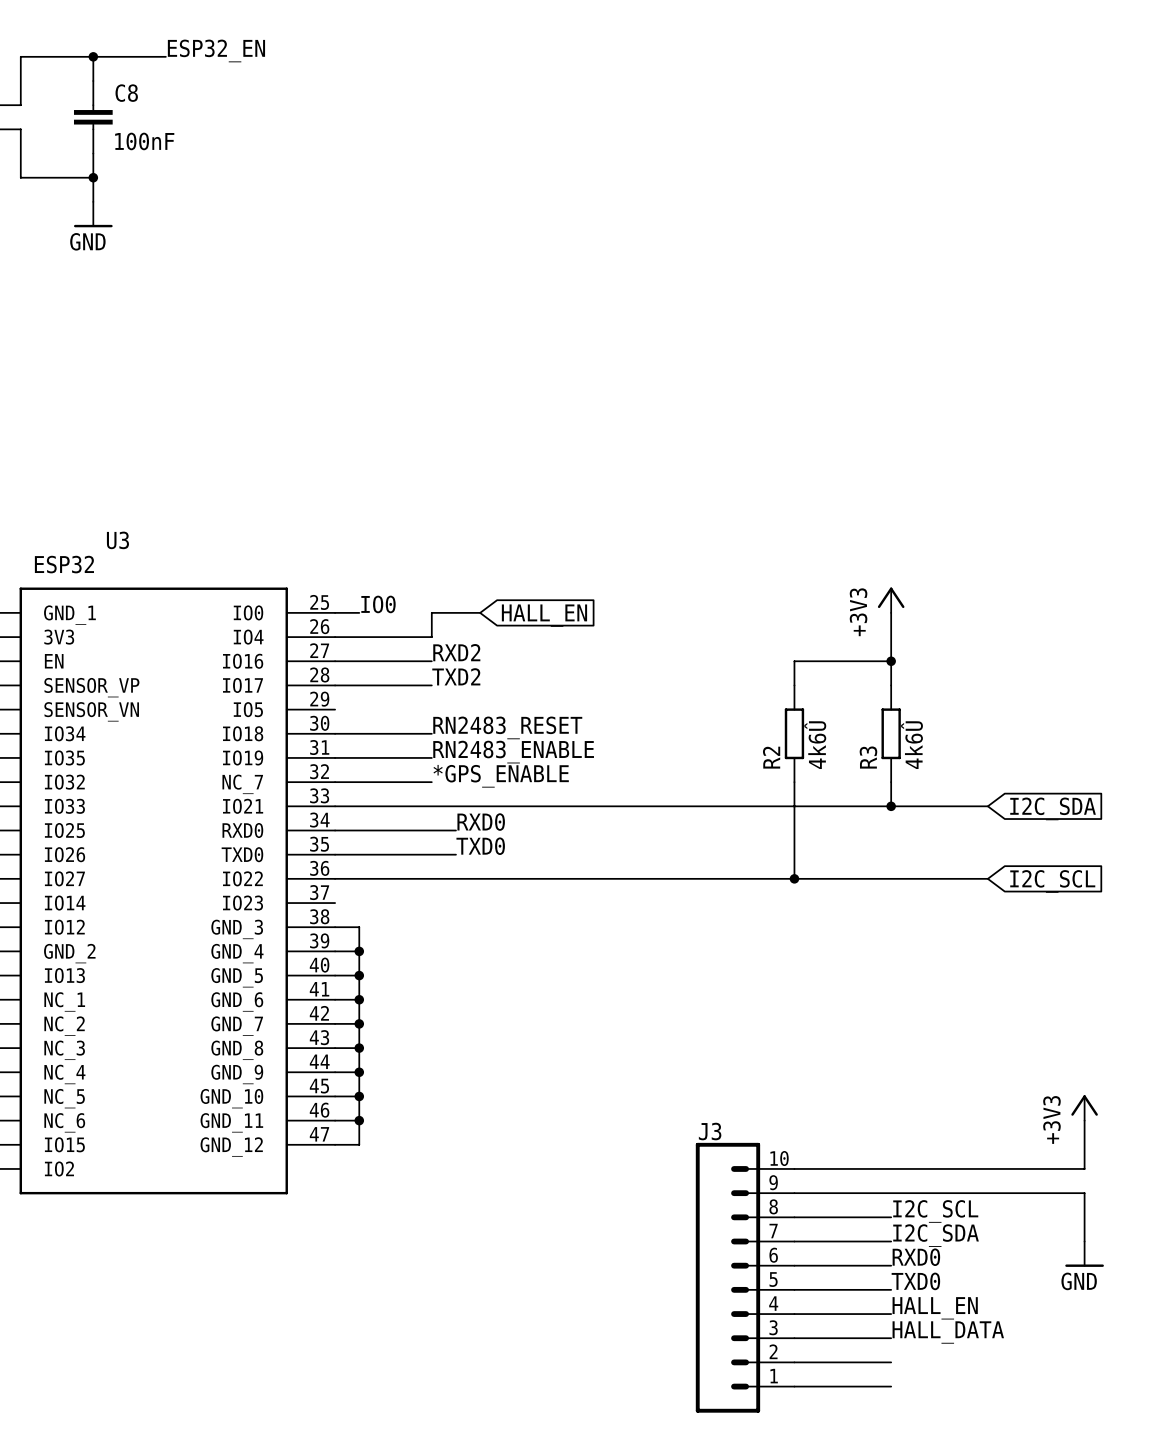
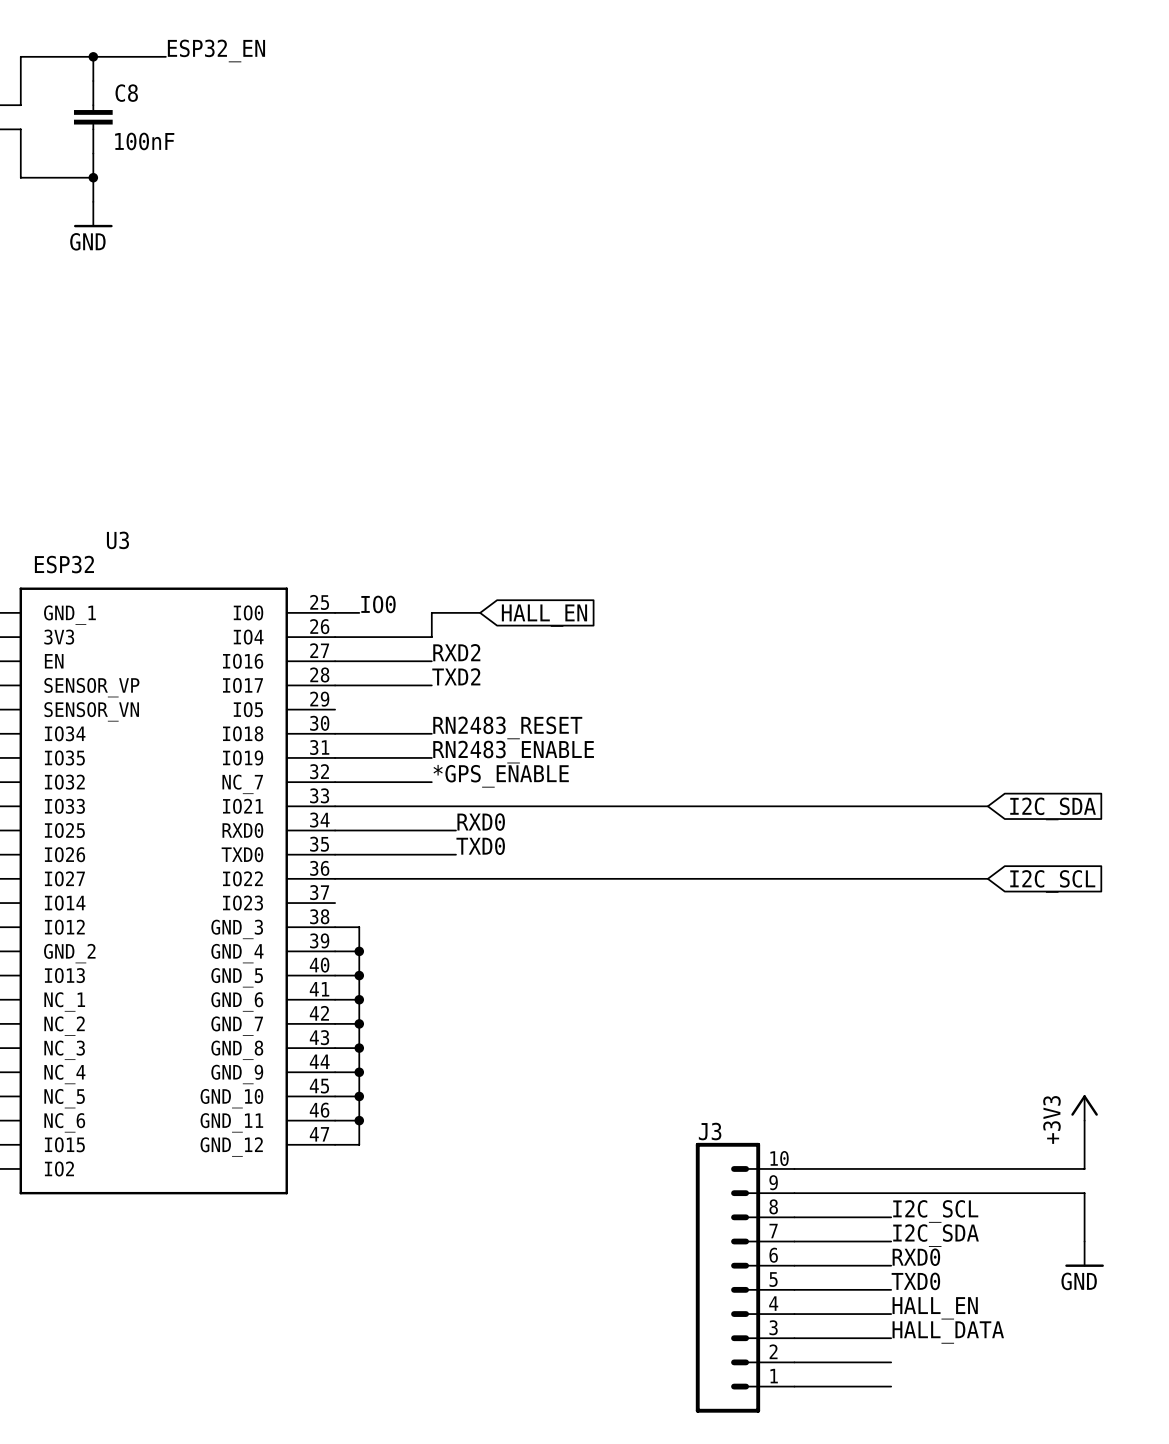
power symbol: +3V3 (891, 600) -> none
wire: (891, 612) (891, 685) -> none
wire: (891, 661) (794, 661) (794, 685) -> none
junction: (891, 661) -> none
R2: 4k6Û (794, 733) -> none
R3: 4k6Û (891, 733) -> none
wire: (794, 782) (794, 878) -> none
wire: (891, 782) (891, 806) -> none
junction: (891, 806) -> none
junction: (794, 878) -> none

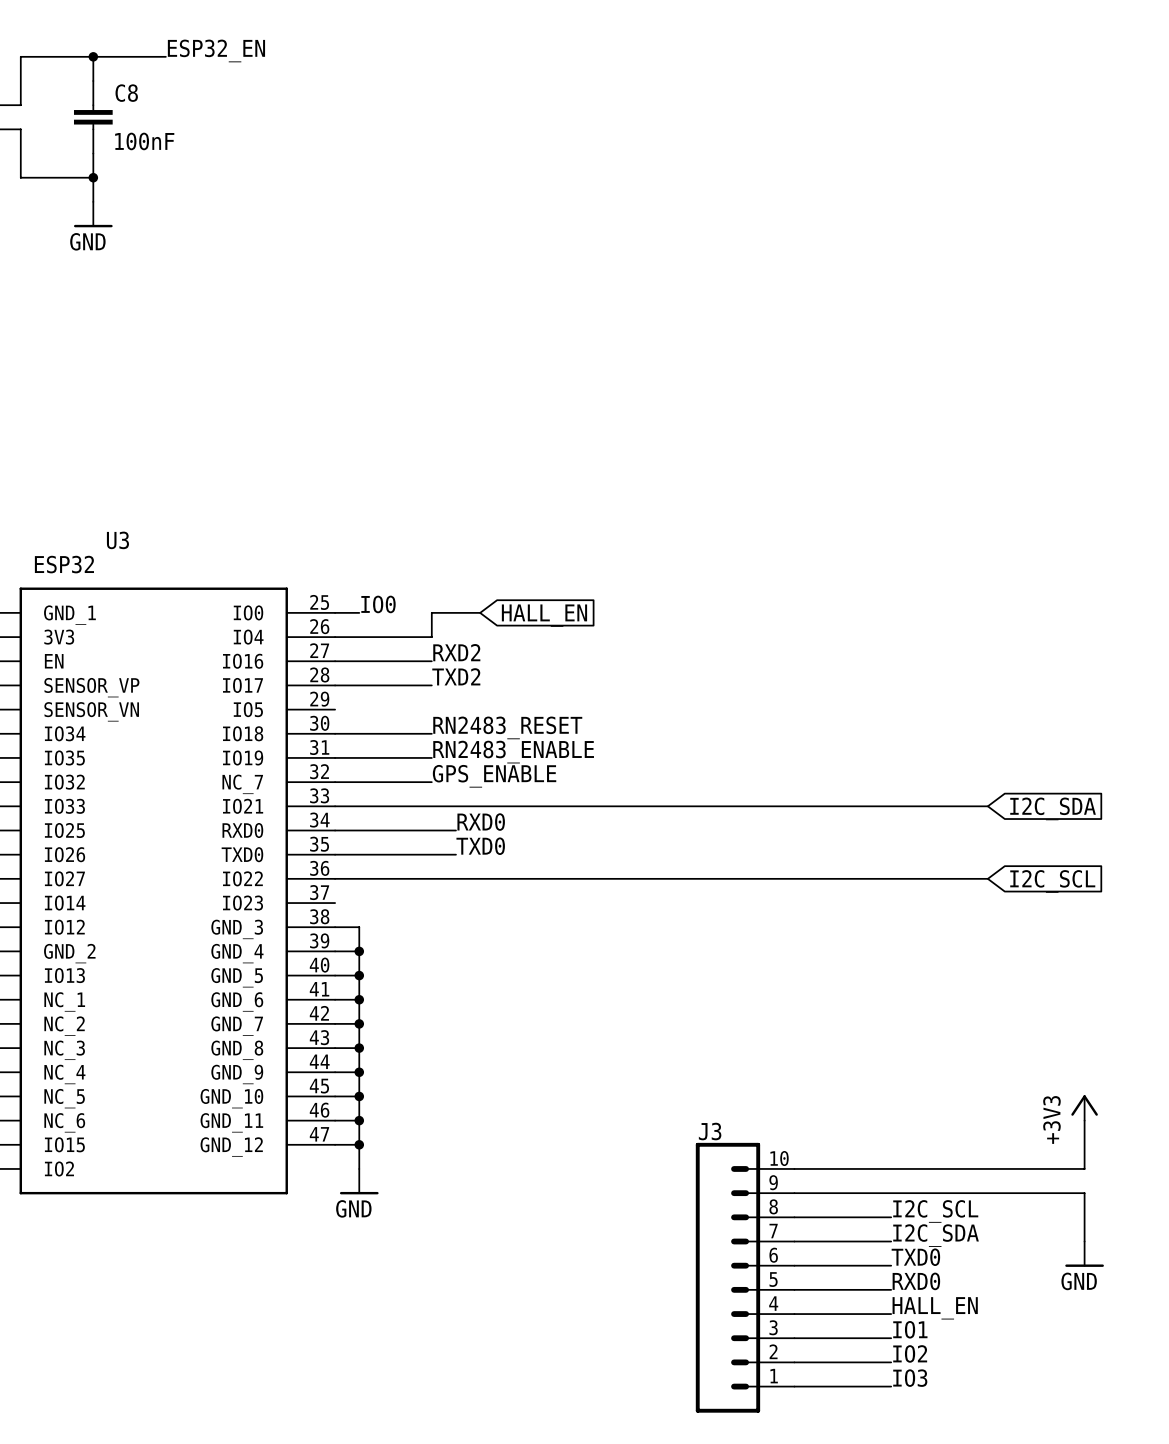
label: *GPS_ENABLE (501, 776) -> GPS_ENABLE (494, 776)
wire: none -> (359, 1144) (359, 1168)
junction: none -> (359, 1144)
power symbol: none -> GND (359, 1181)
label: RXD0 (916, 1257) -> TXD0 (915, 1257)
label: TXD0 (915, 1281) -> RXD0 (916, 1281)
label: HALL_DATA (948, 1332) -> IO1 (910, 1329)
label: none -> IO2 (910, 1353)
label: none -> IO3 (910, 1378)

